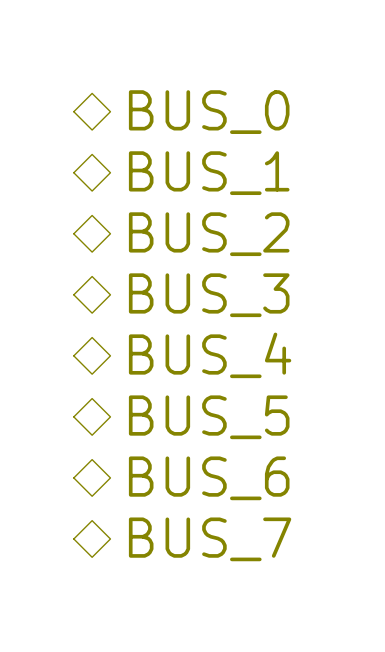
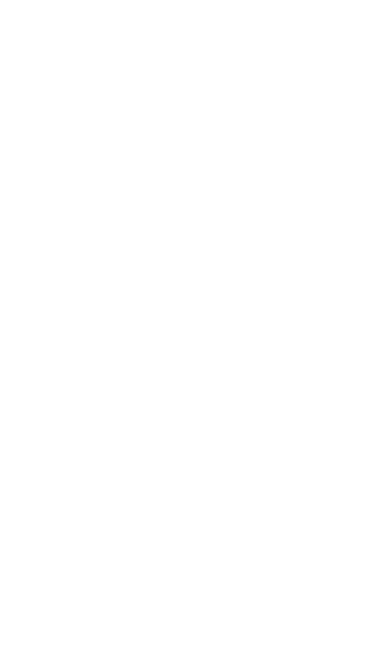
hierarchical label: BUS_0 (209, 112) -> none
hierarchical label: BUS_1 (209, 173) -> none
hierarchical label: BUS_2 (209, 234) -> none
hierarchical label: BUS_3 (209, 295) -> none
hierarchical label: BUS_4 (210, 355) -> none
hierarchical label: BUS_5 (209, 417) -> none
hierarchical label: BUS_6 (209, 478) -> none
hierarchical label: BUS_7 (210, 539) -> none

